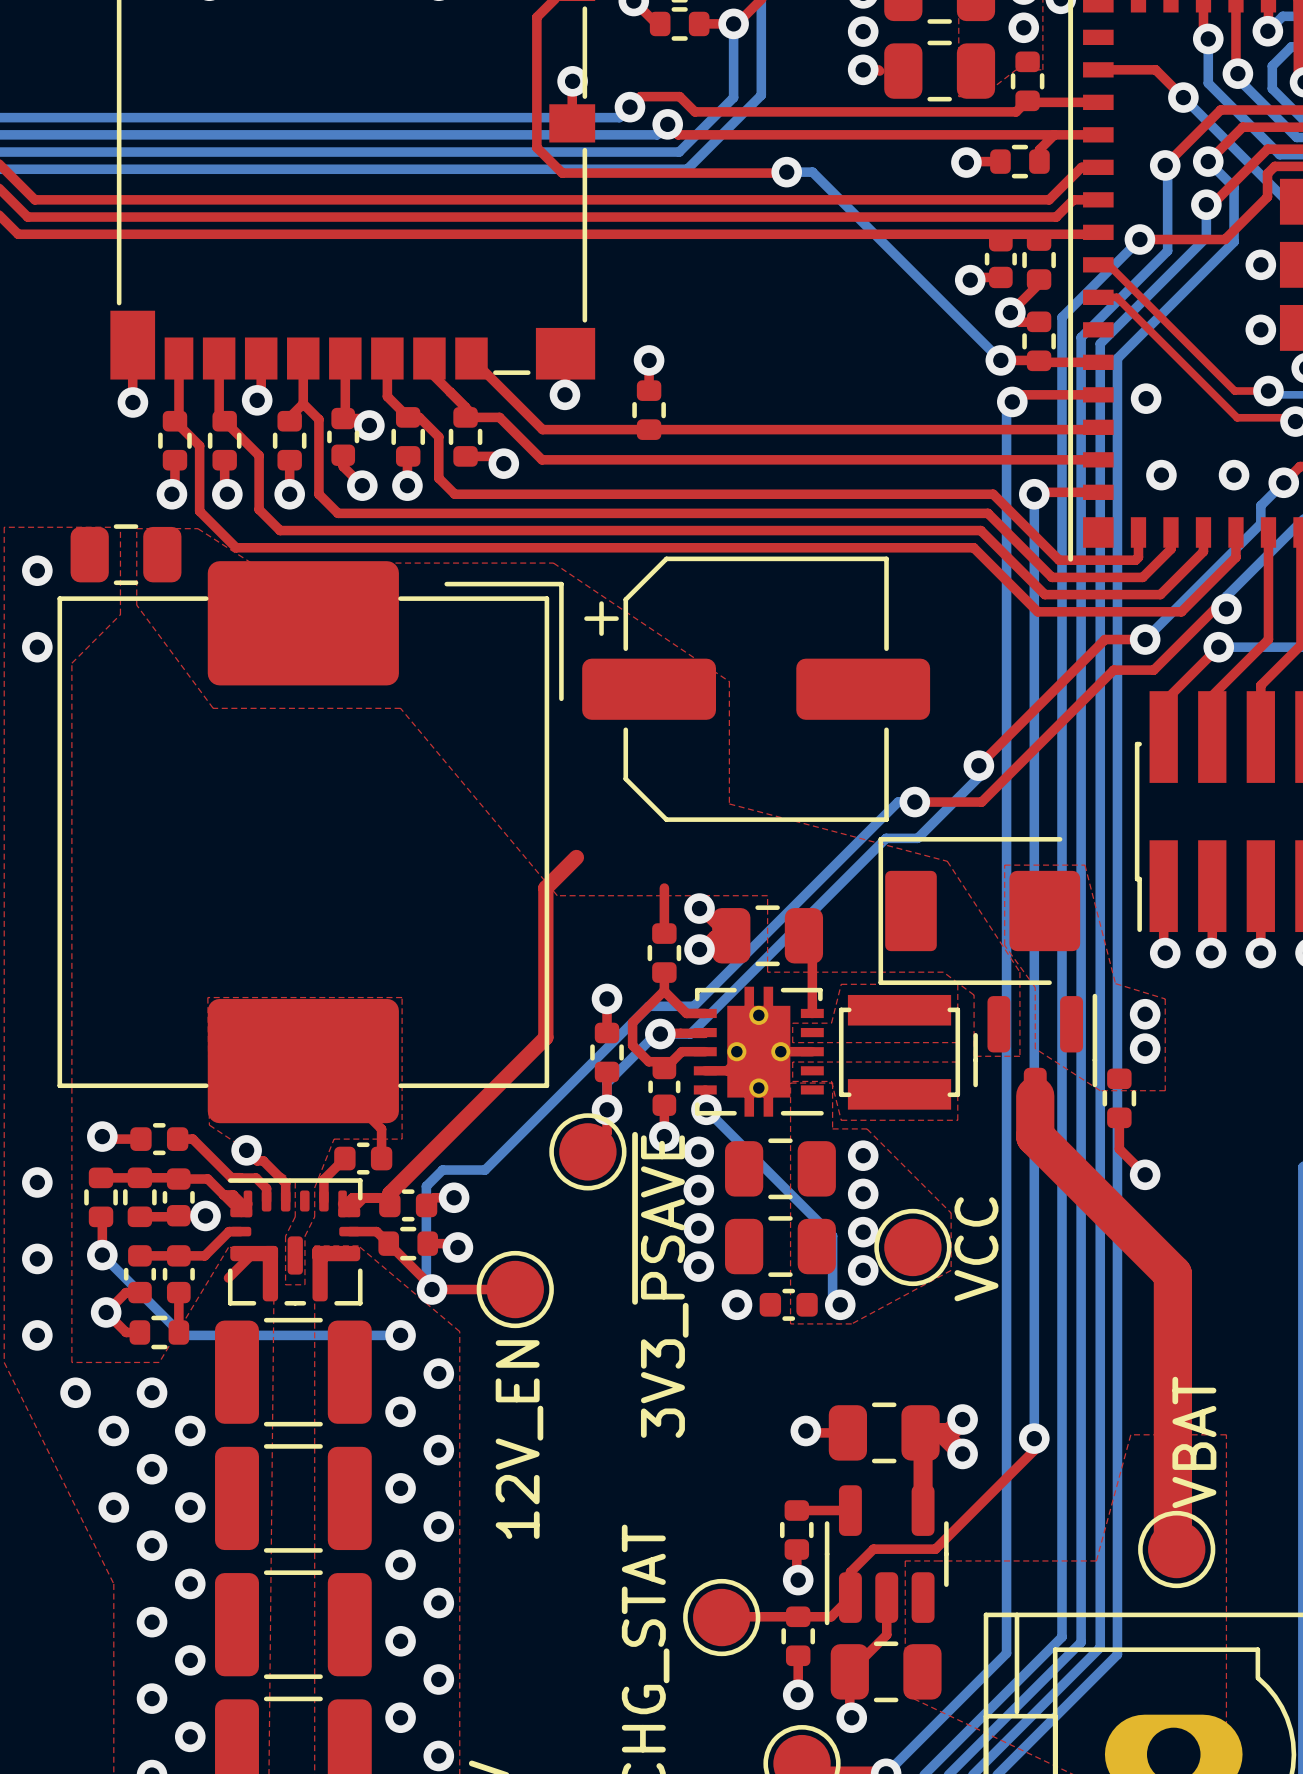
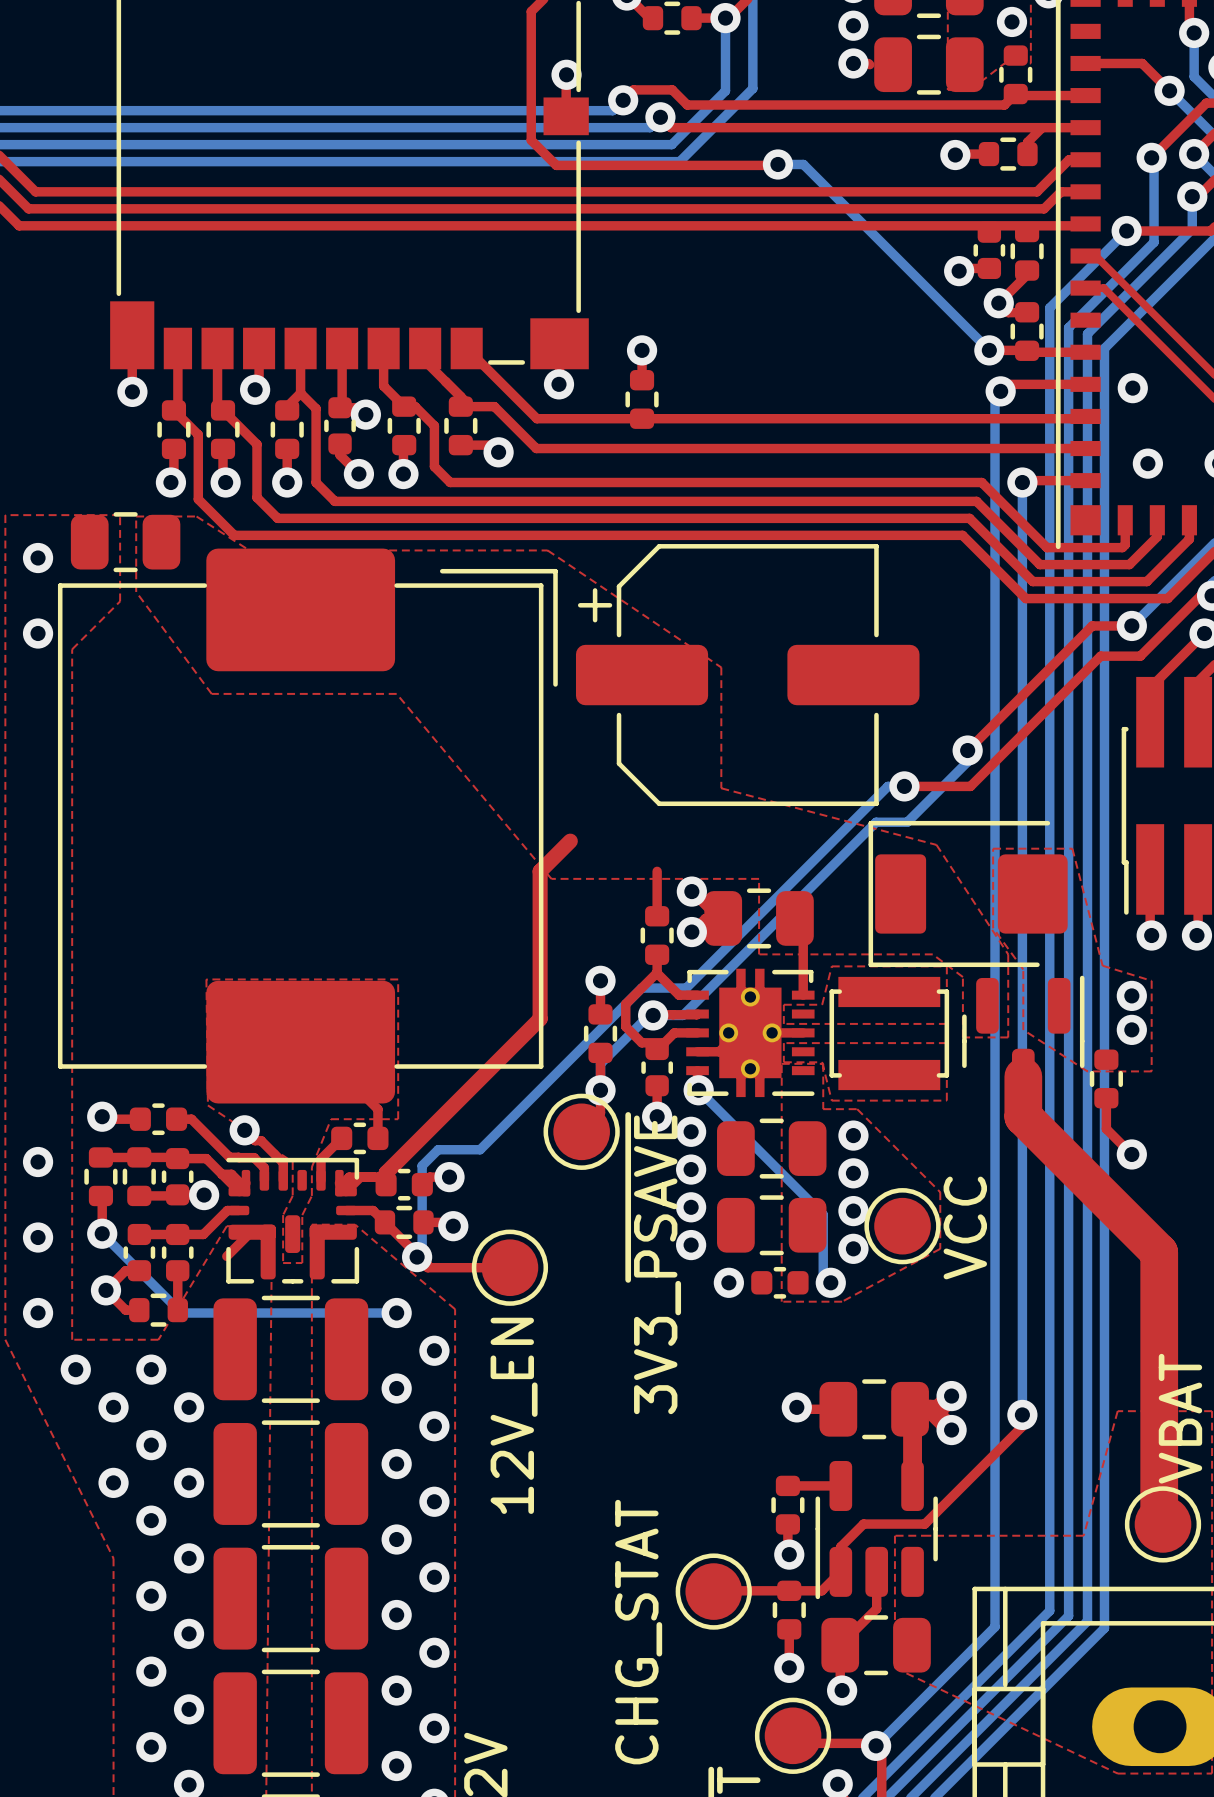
via position: (432, 1289) -> (417, 1257)

